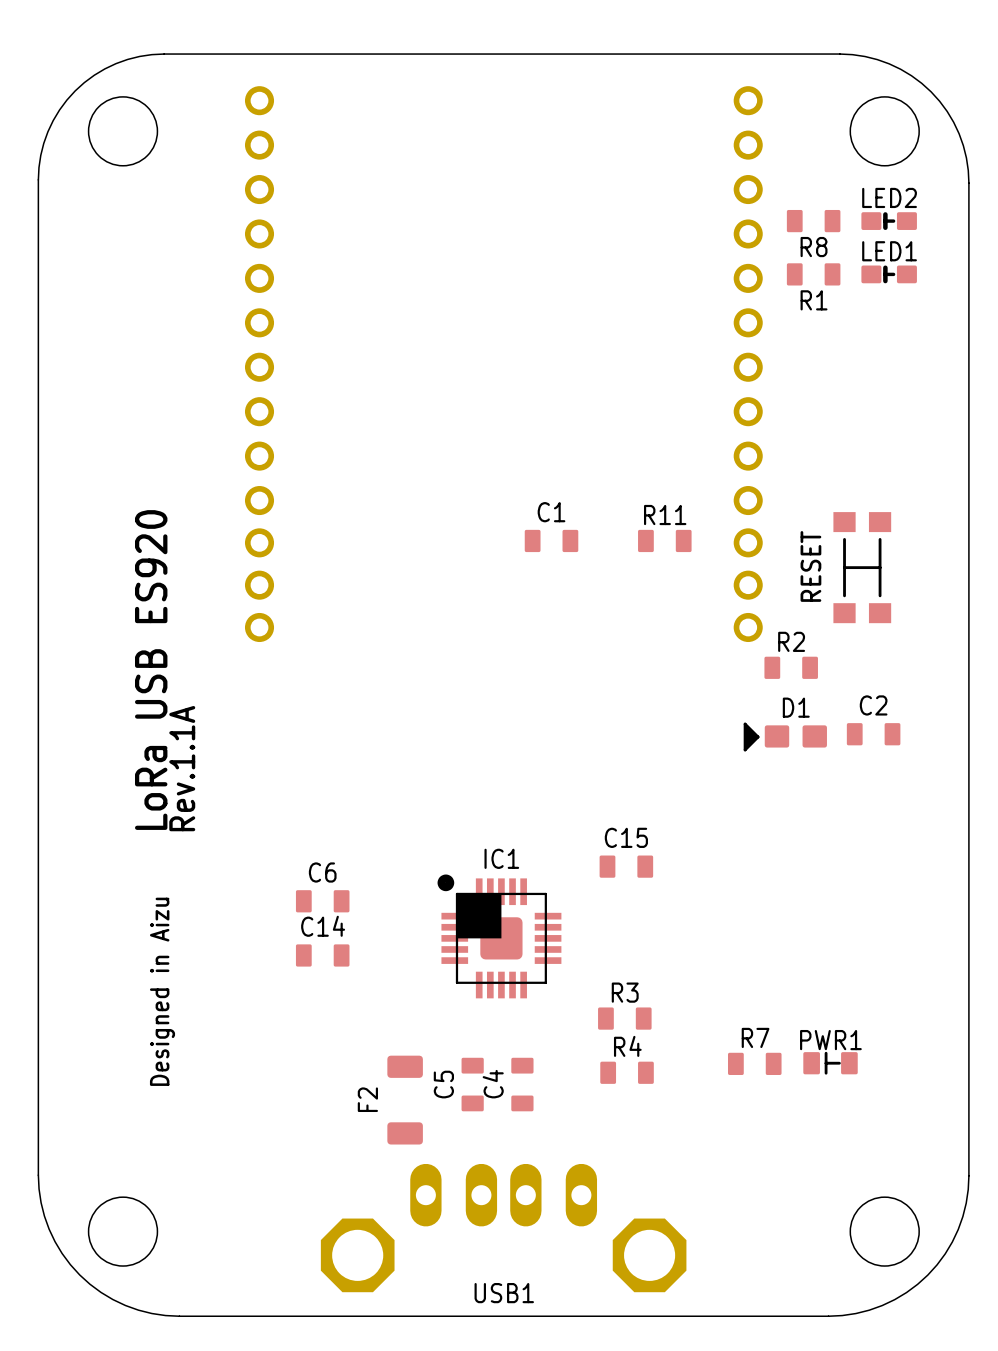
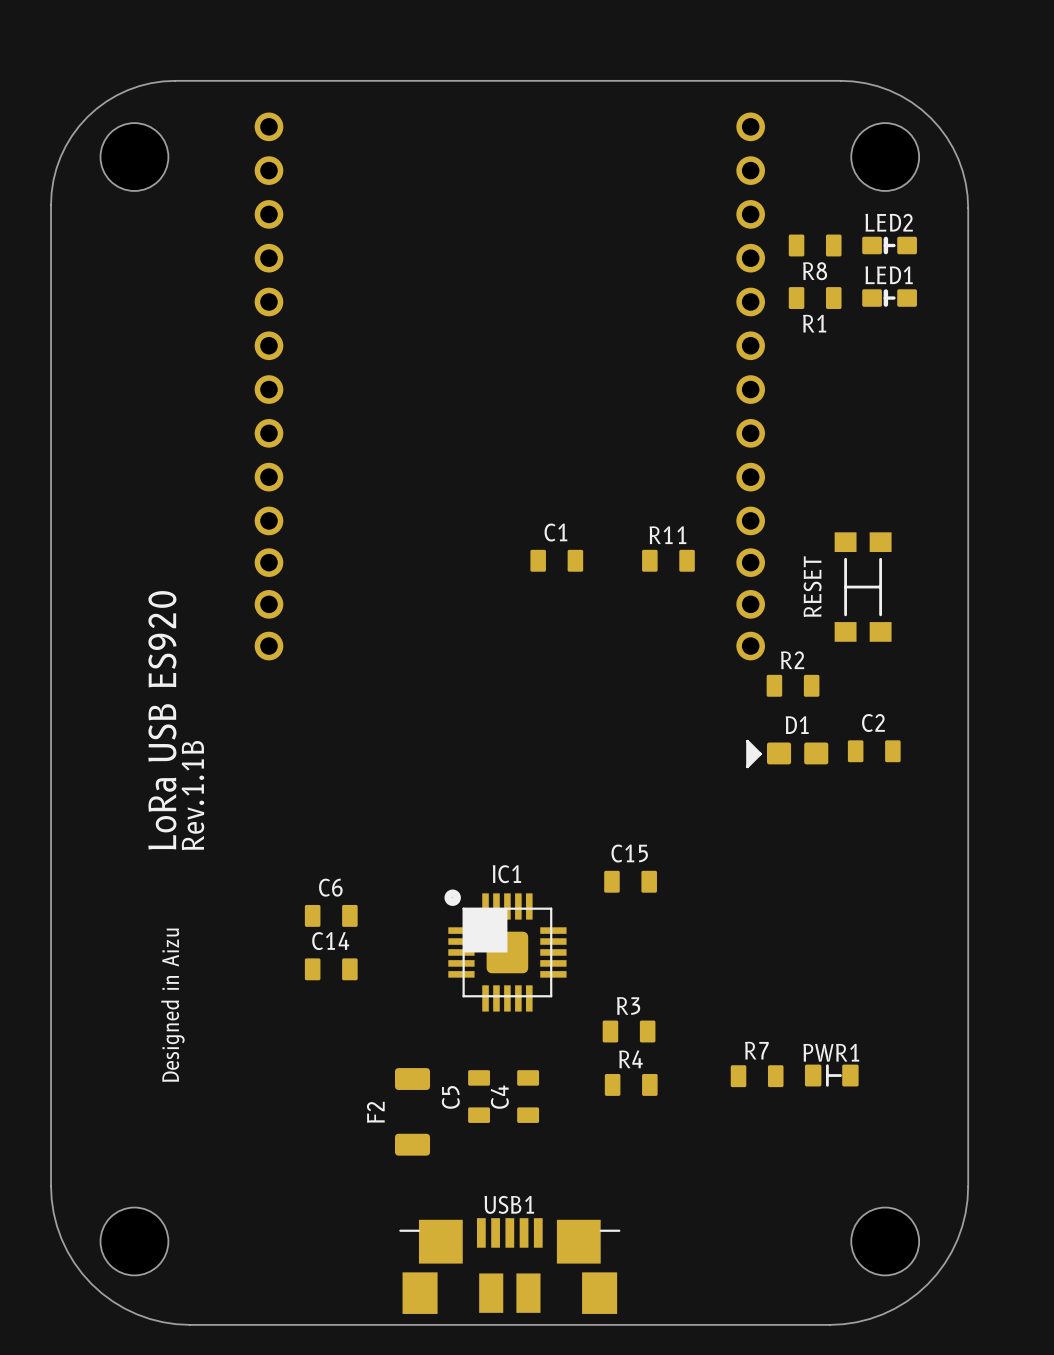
text: Rev.1.1A (182, 768) -> Rev.1.1B (192, 795)
USB1 footprint: [320, 1163, 687, 1293] -> [399, 1218, 621, 1314]
USB1 name position: USB1 (504, 1293) -> USB1 (509, 1204)

